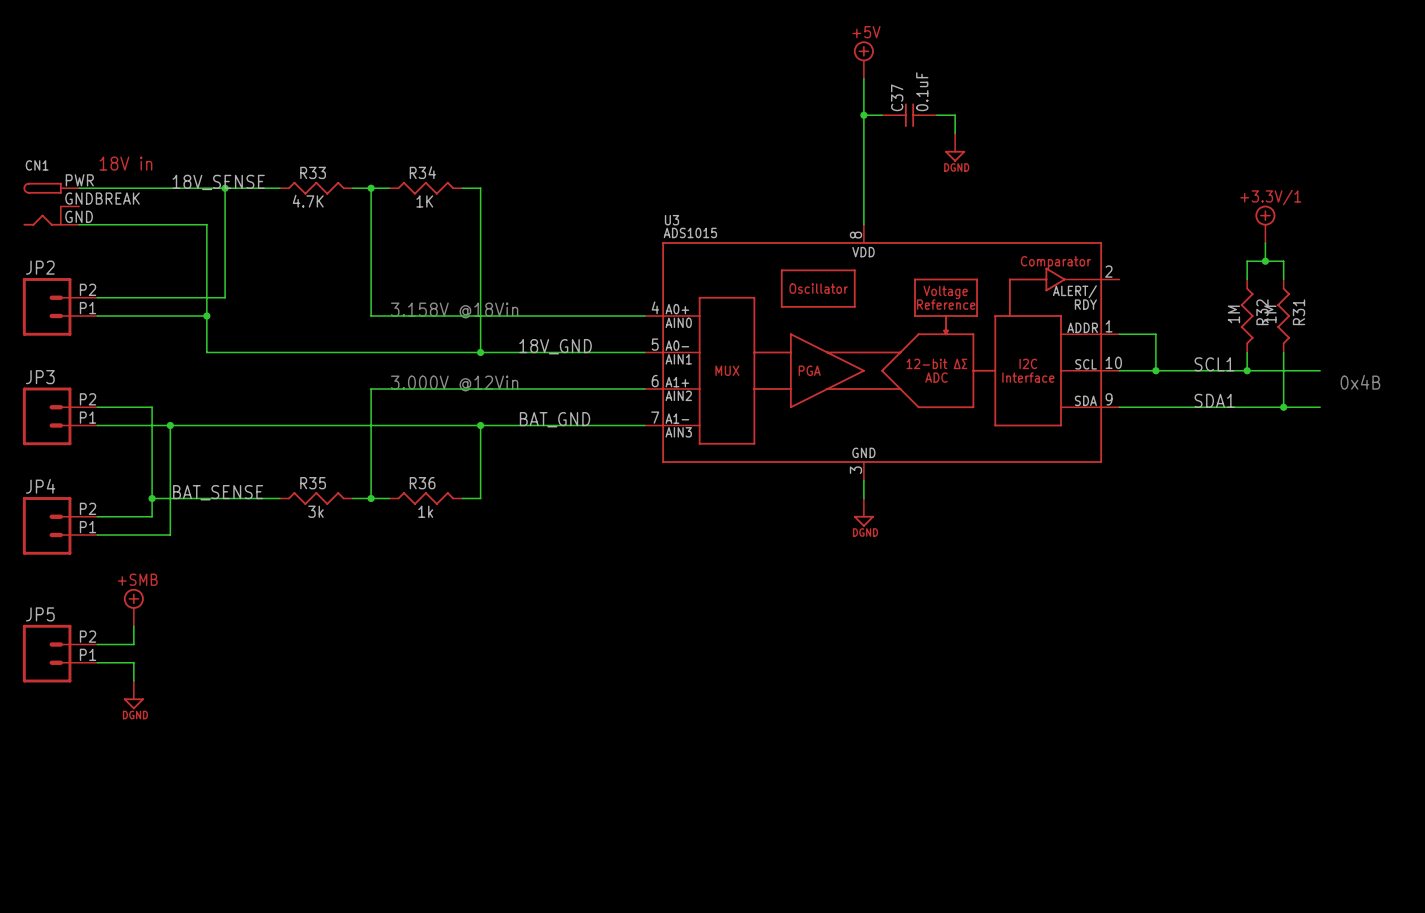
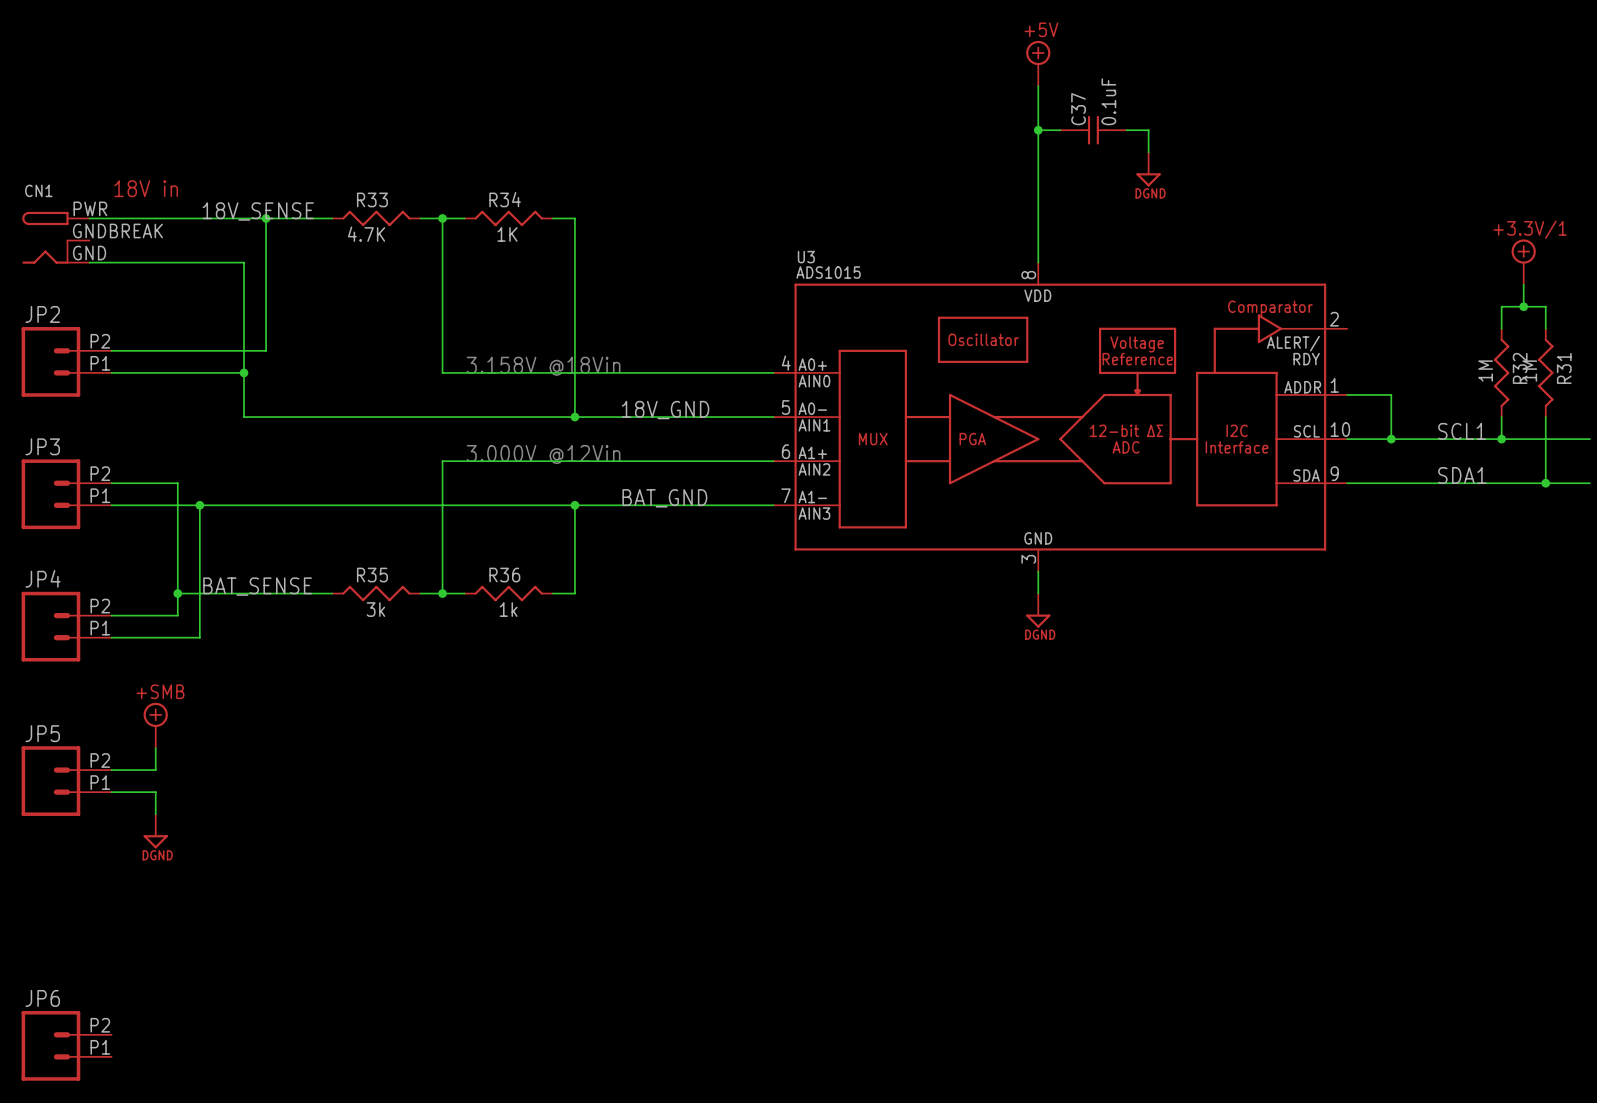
JP6: none -> (66, 1045)

